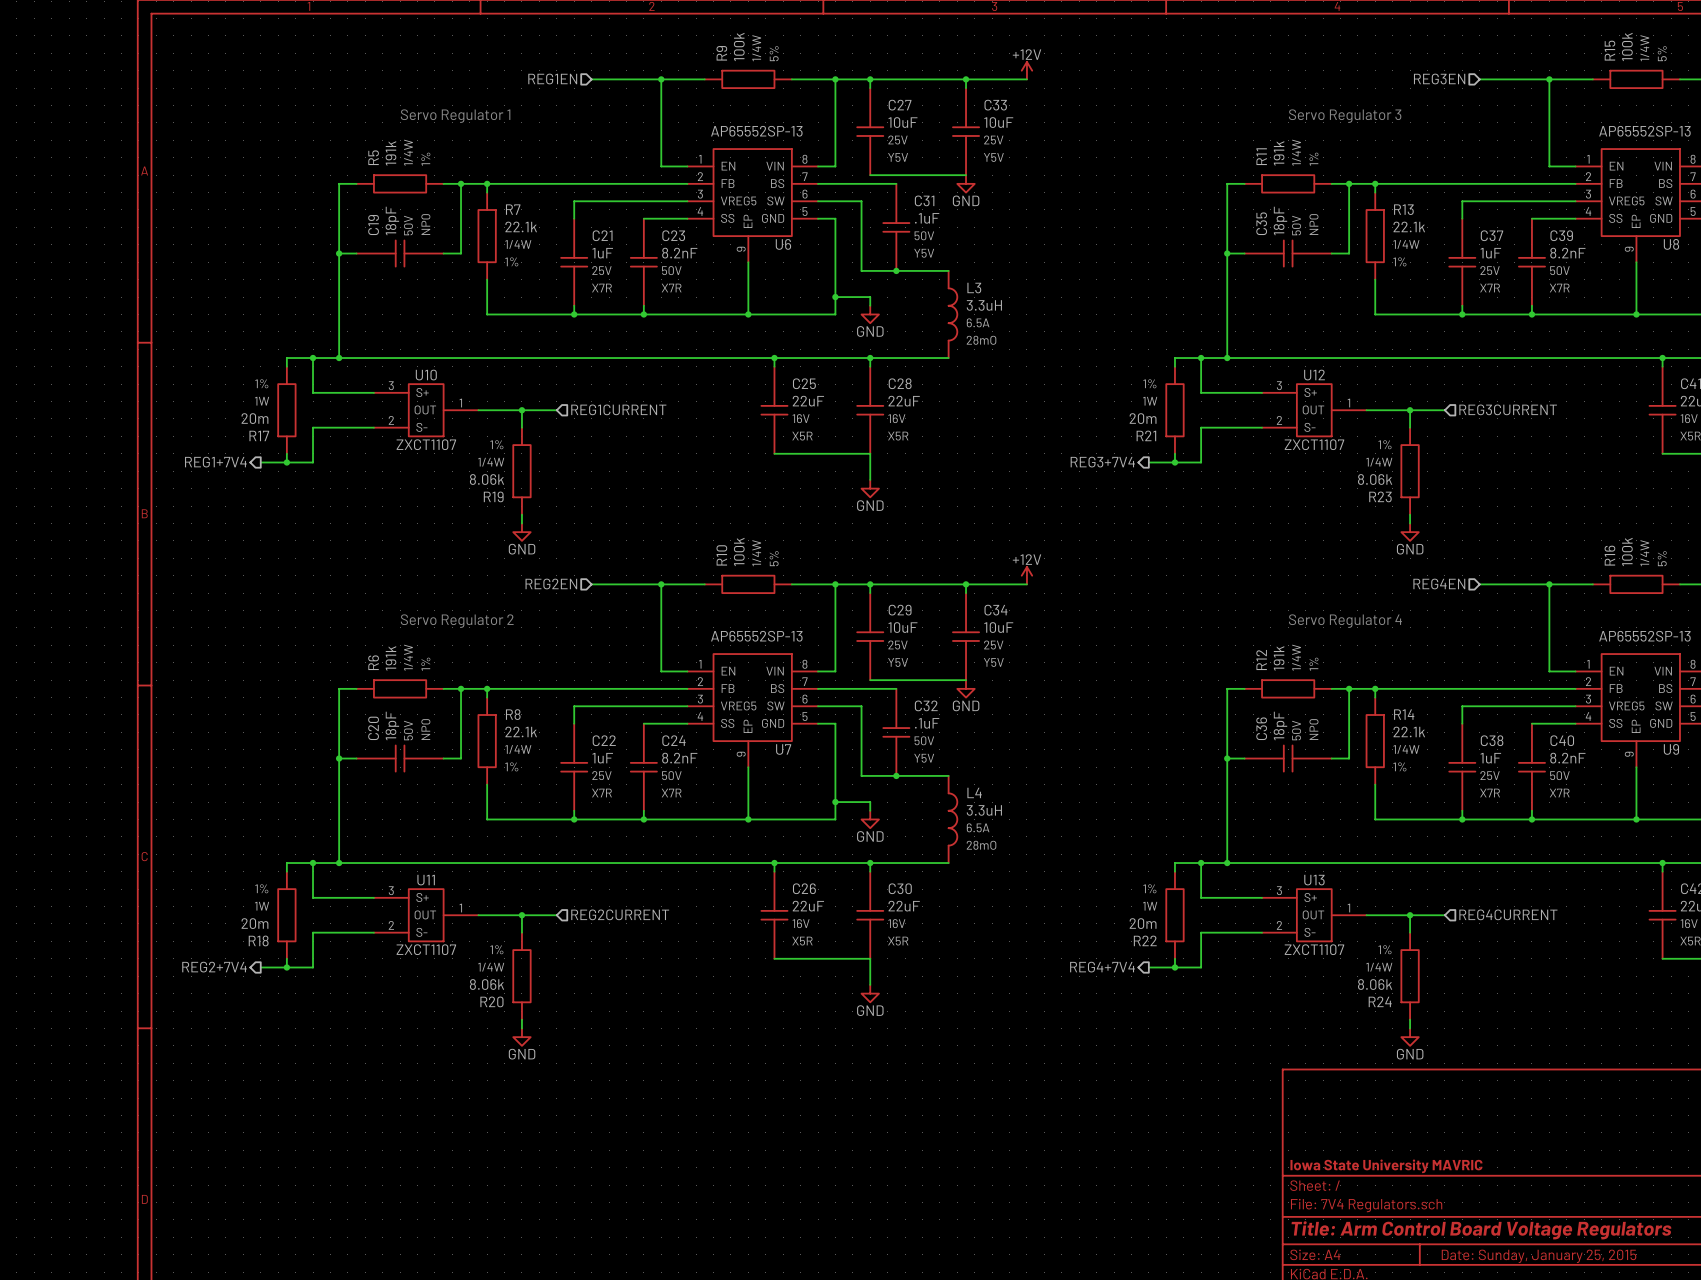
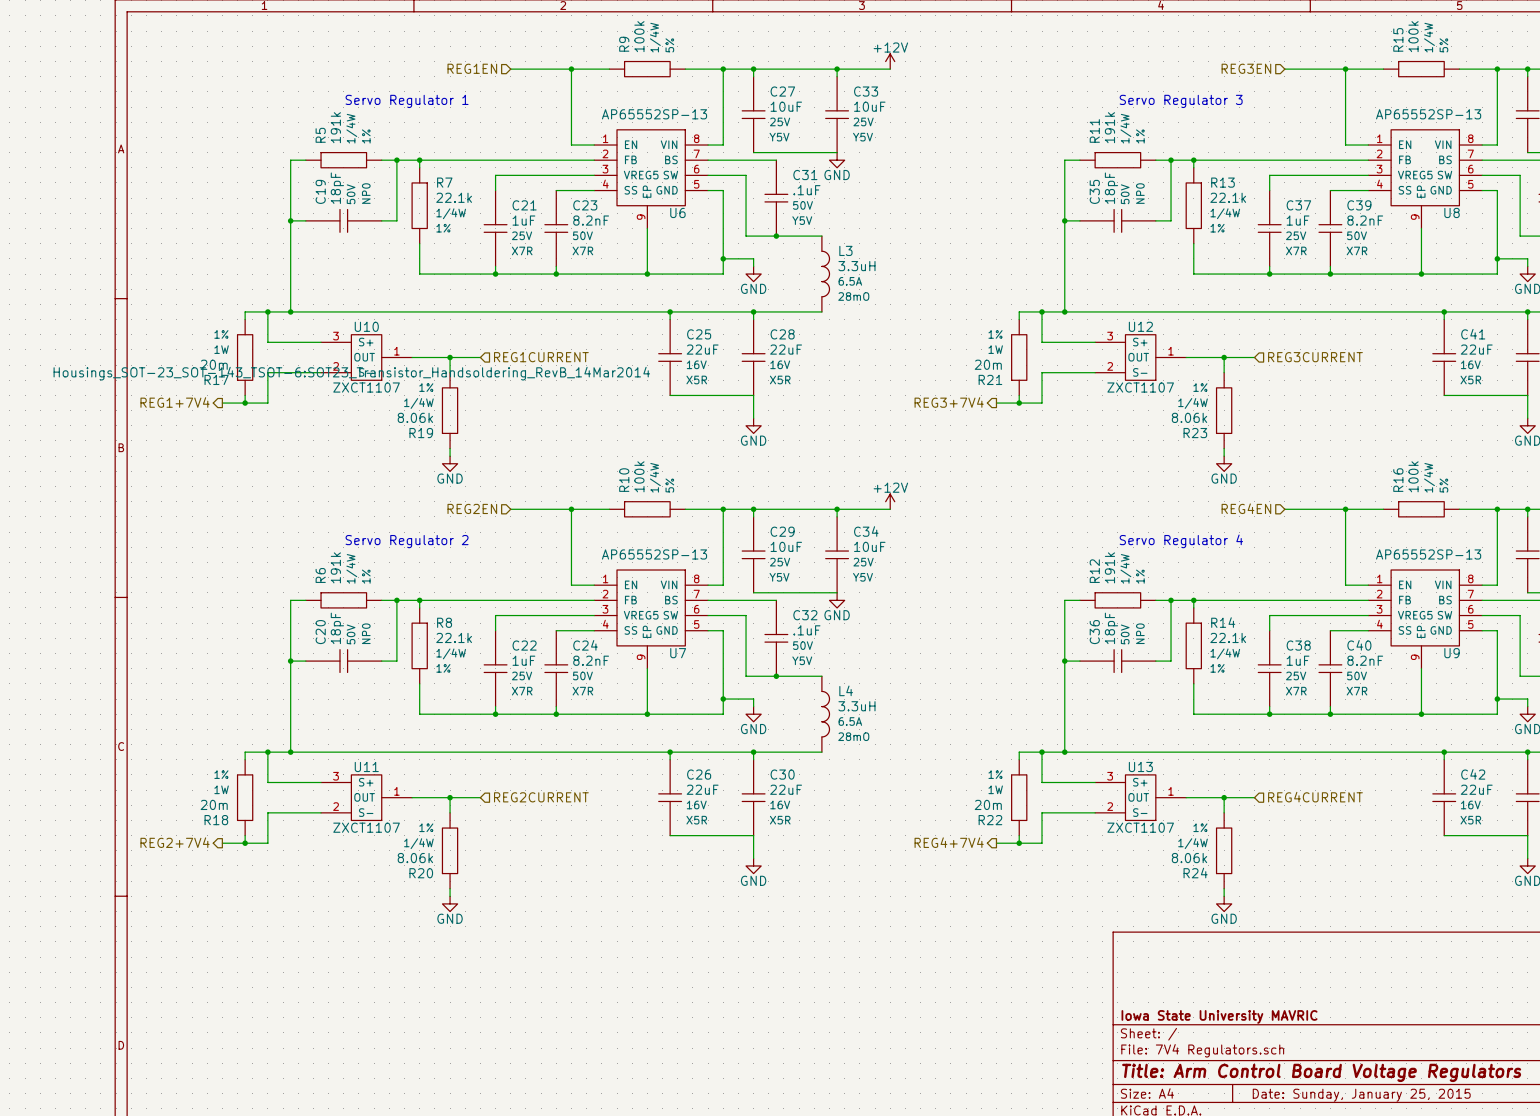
U10 text: none -> Housings_SOT-23_SOT-143_TSOT-6:SOT23_Transistor_Handsoldering_RevB_14Mar2014 (351, 373)

